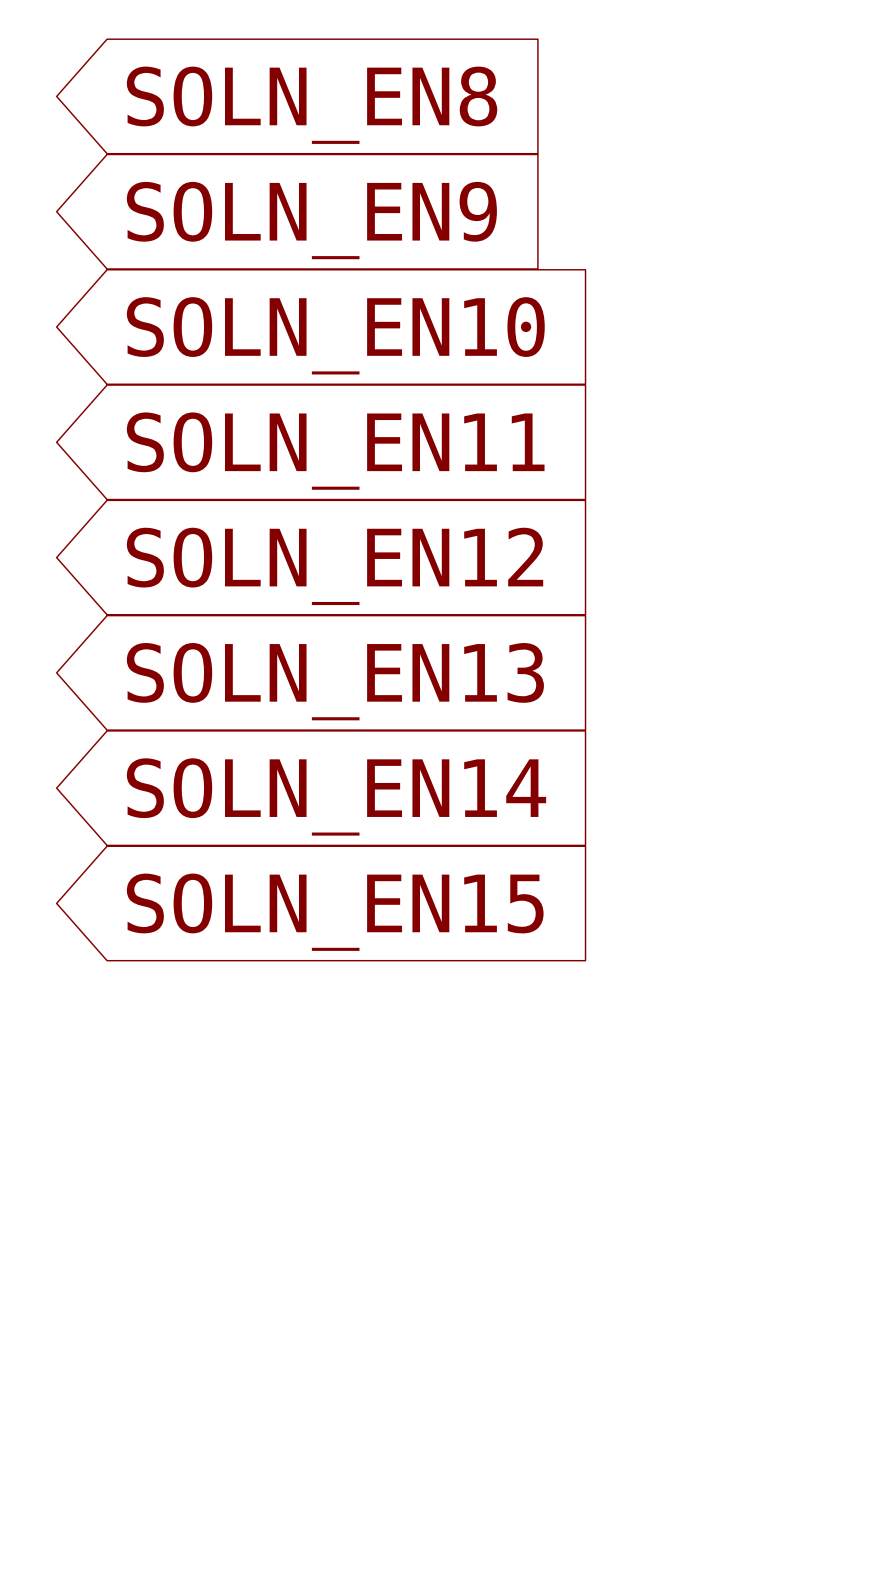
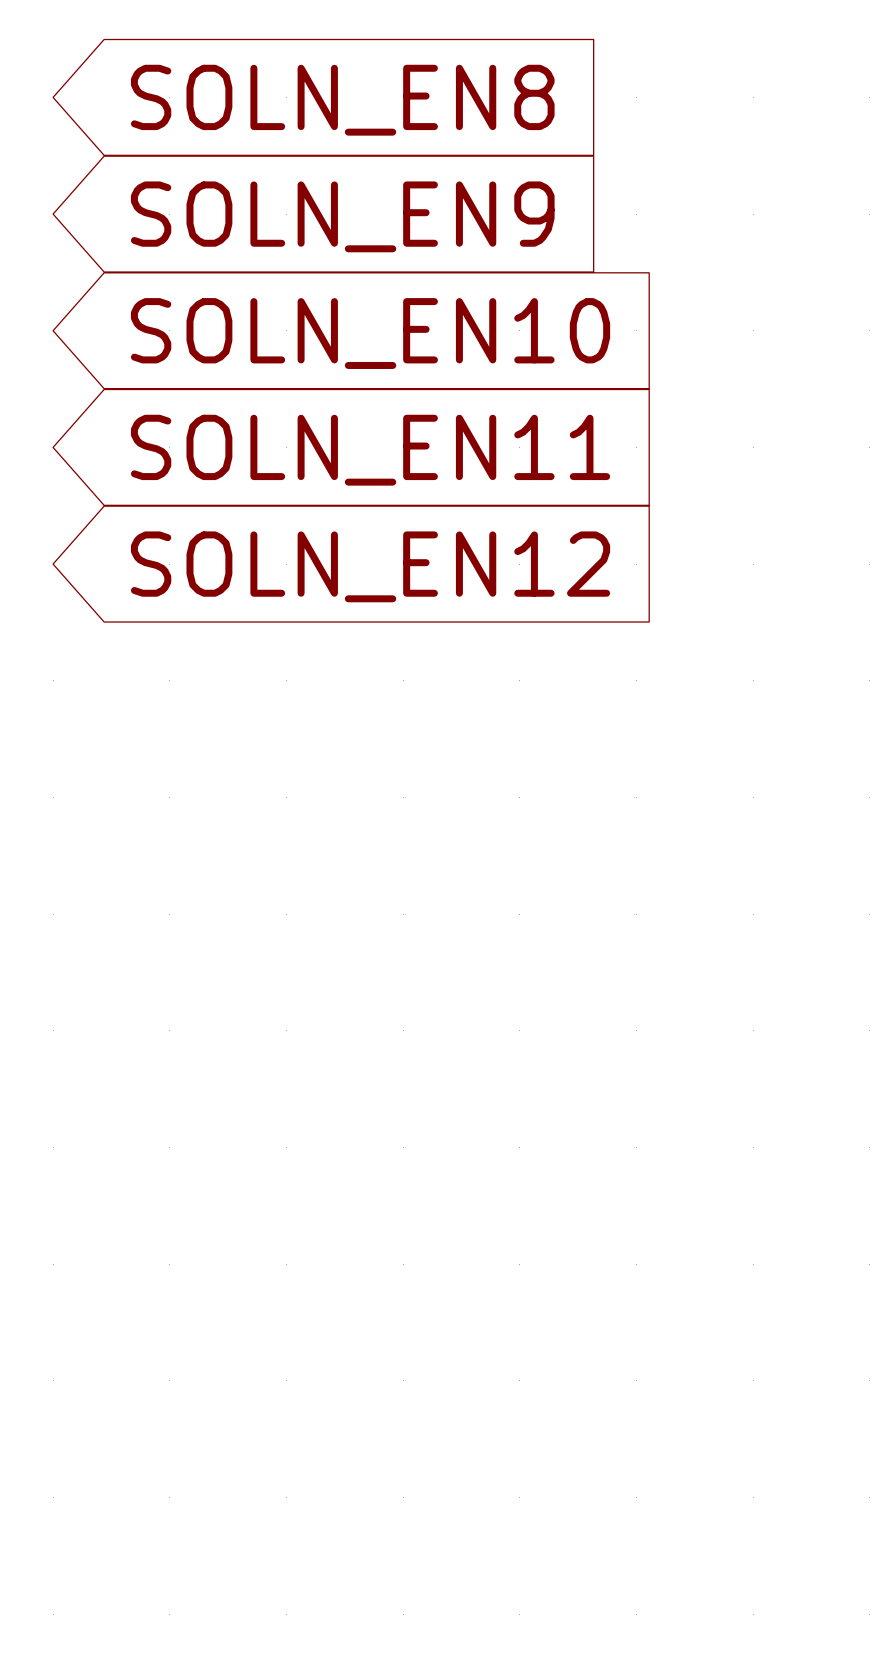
global label: SOLN_EN13 (335, 681) -> none
global label: SOLN_EN14 (336, 796) -> none
global label: SOLN_EN15 (335, 912) -> none

